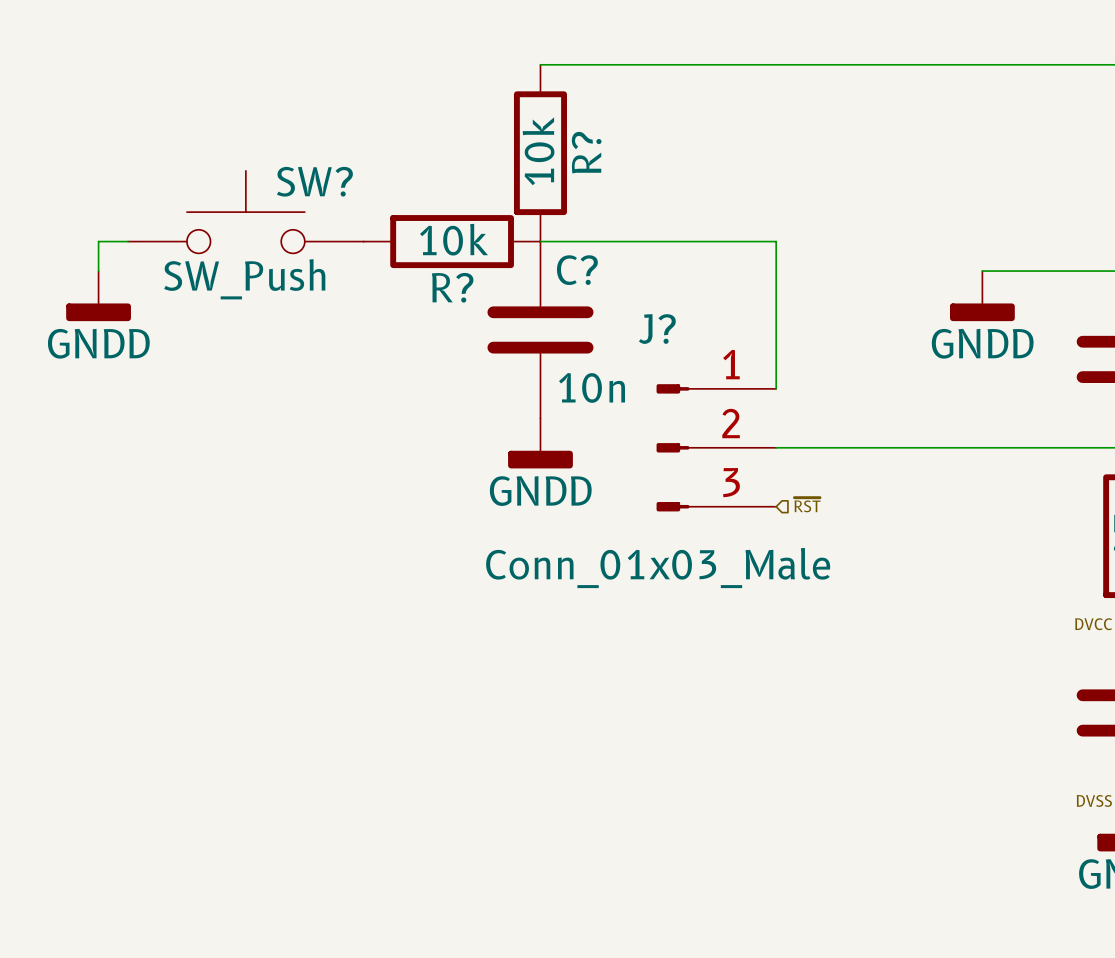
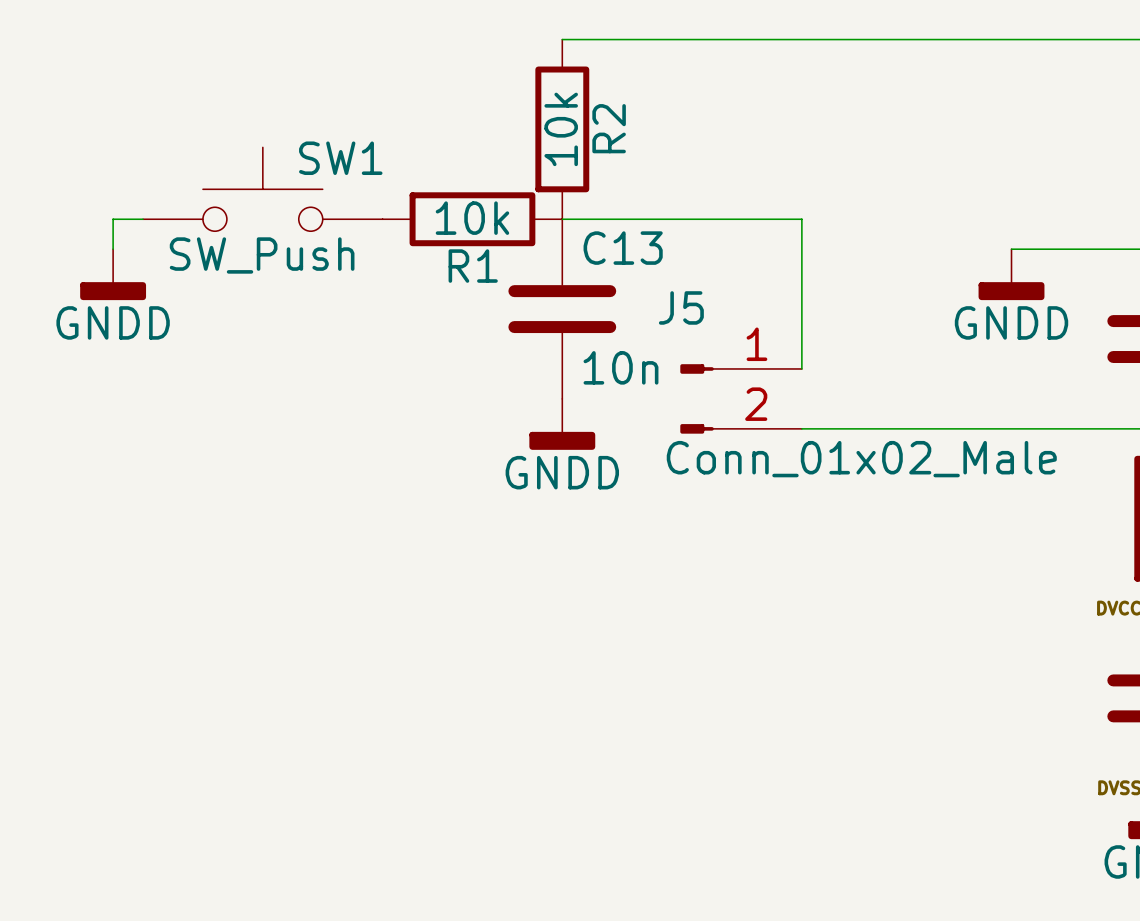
R? name: R? (586, 152) -> R2 (609, 128)
SW? name: SW? (314, 181) -> SW1 (340, 158)
C? name: C? (577, 270) -> C13 (623, 248)
R? name: R? (452, 287) -> R1 (473, 266)
J5: none -> Conn_01x02_Male (741, 398)
J?: Conn_01x03_Male (716, 447) -> none
hierarchical label: ~{RST} (807, 504) -> none

